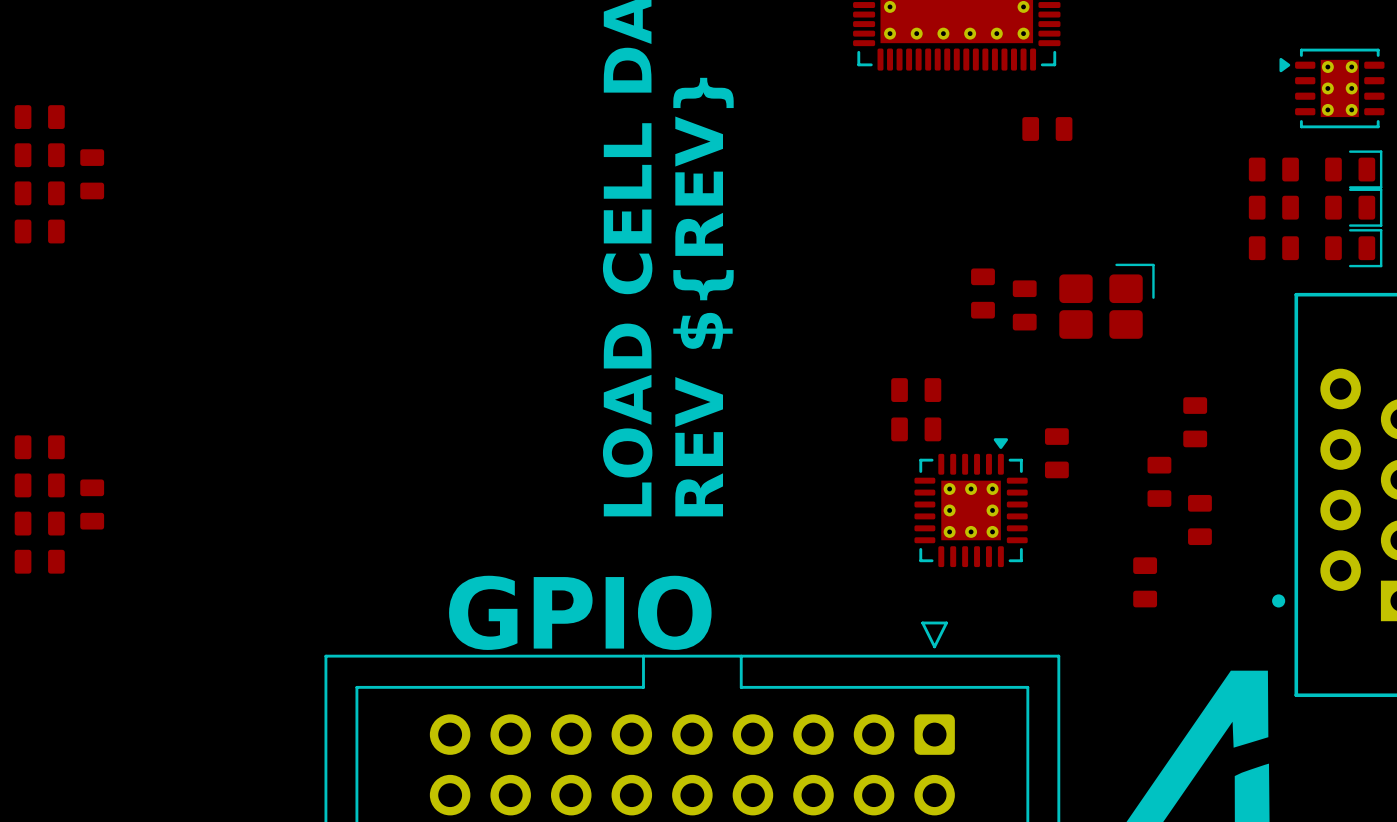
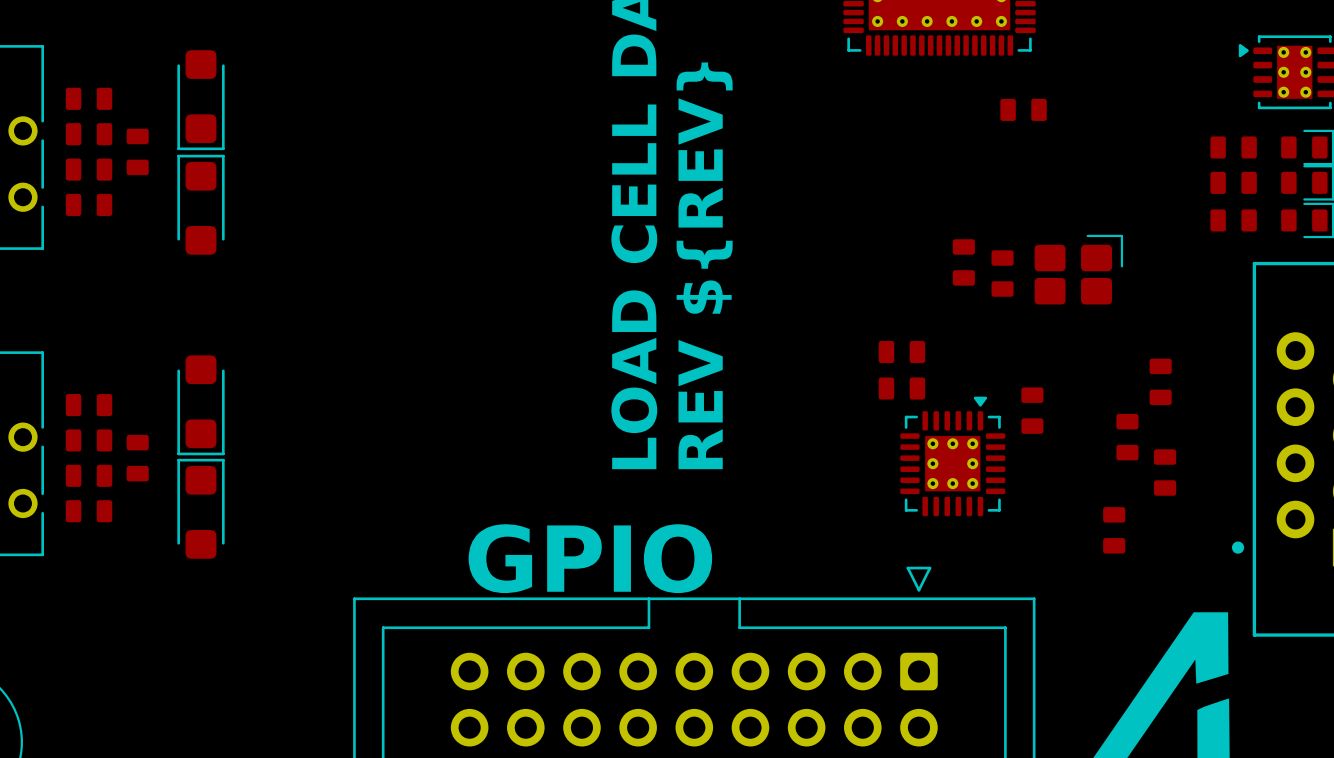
part: none -> (200, 100)
part: none -> (200, 204)
part: none -> (200, 405)
part: none -> (200, 508)

